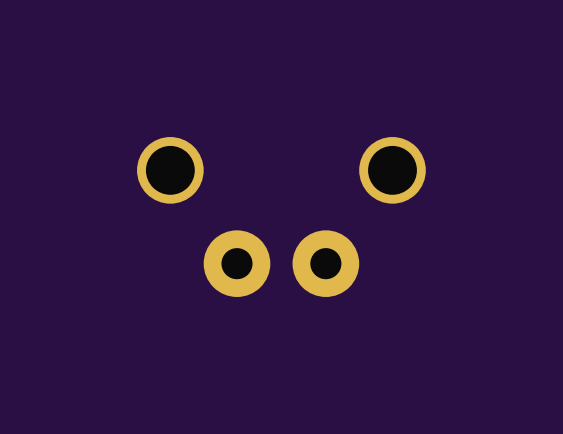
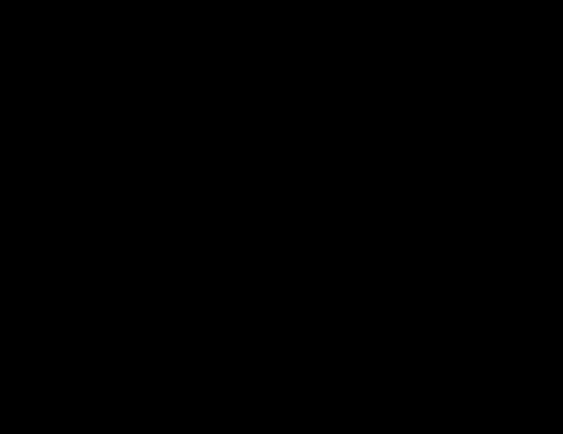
part: (281, 217) -> none

